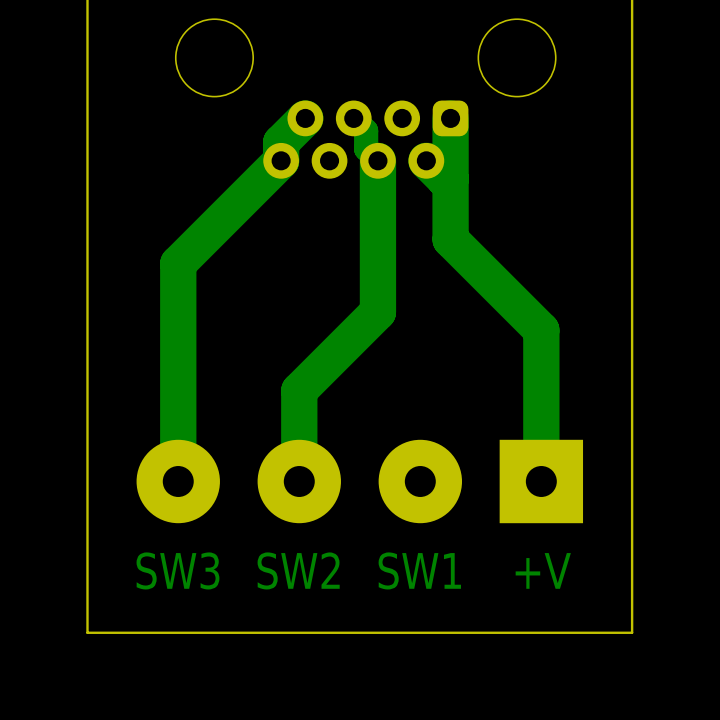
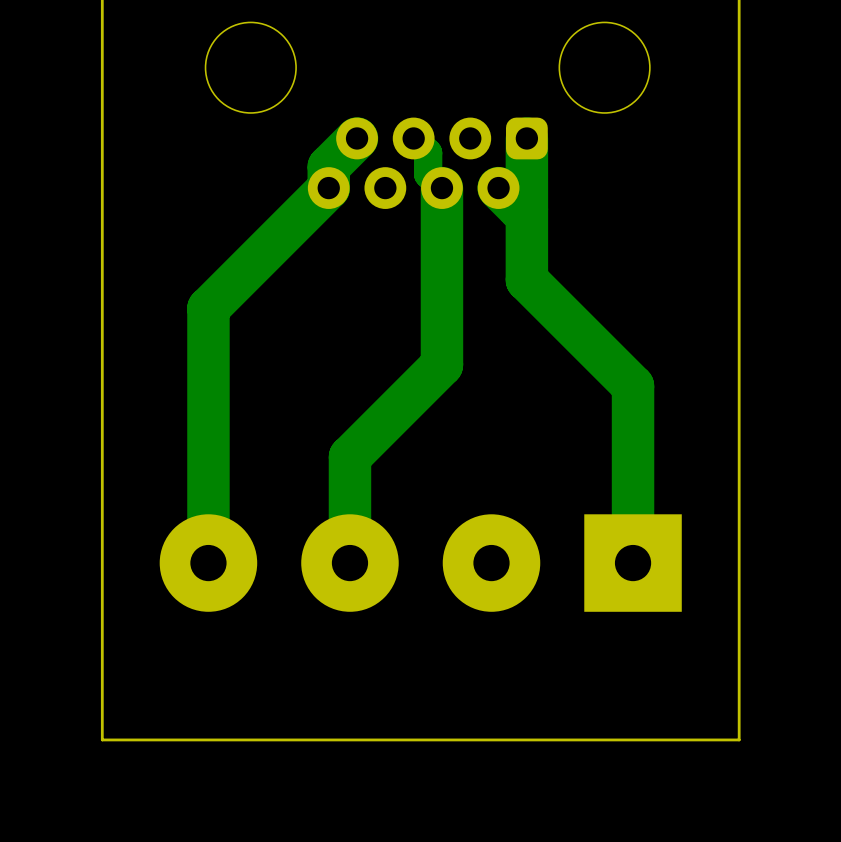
text: SW3 (177, 570) -> none
text: SW2 (298, 570) -> none
text: SW1 (419, 570) -> none
text: +V (543, 570) -> none

